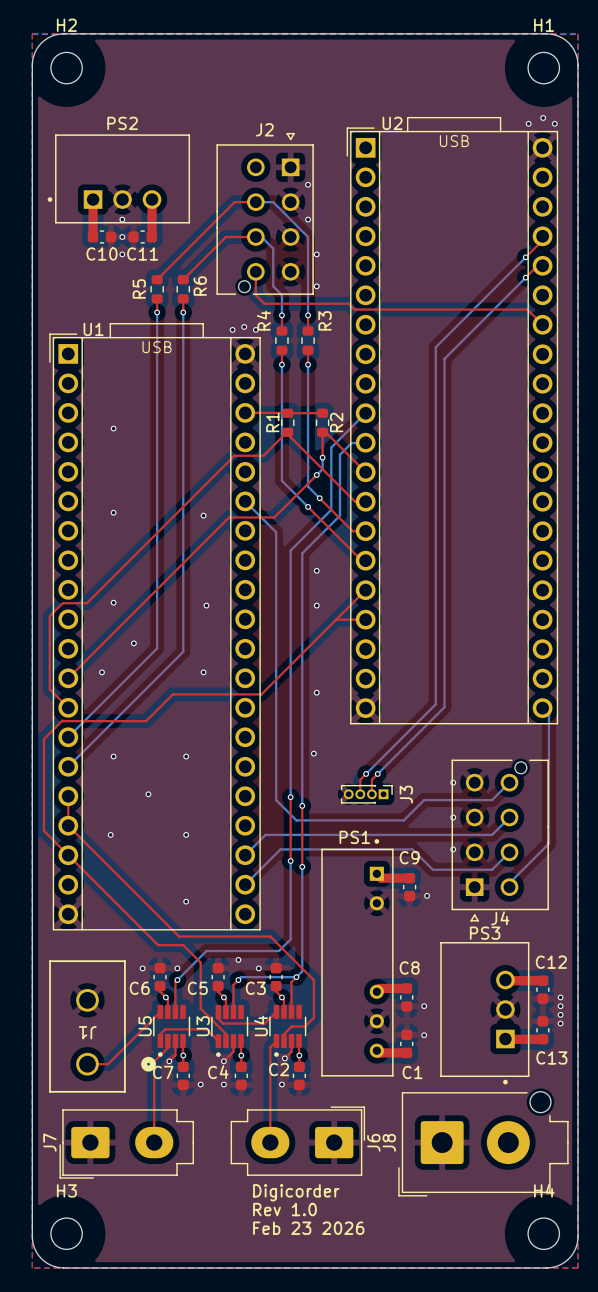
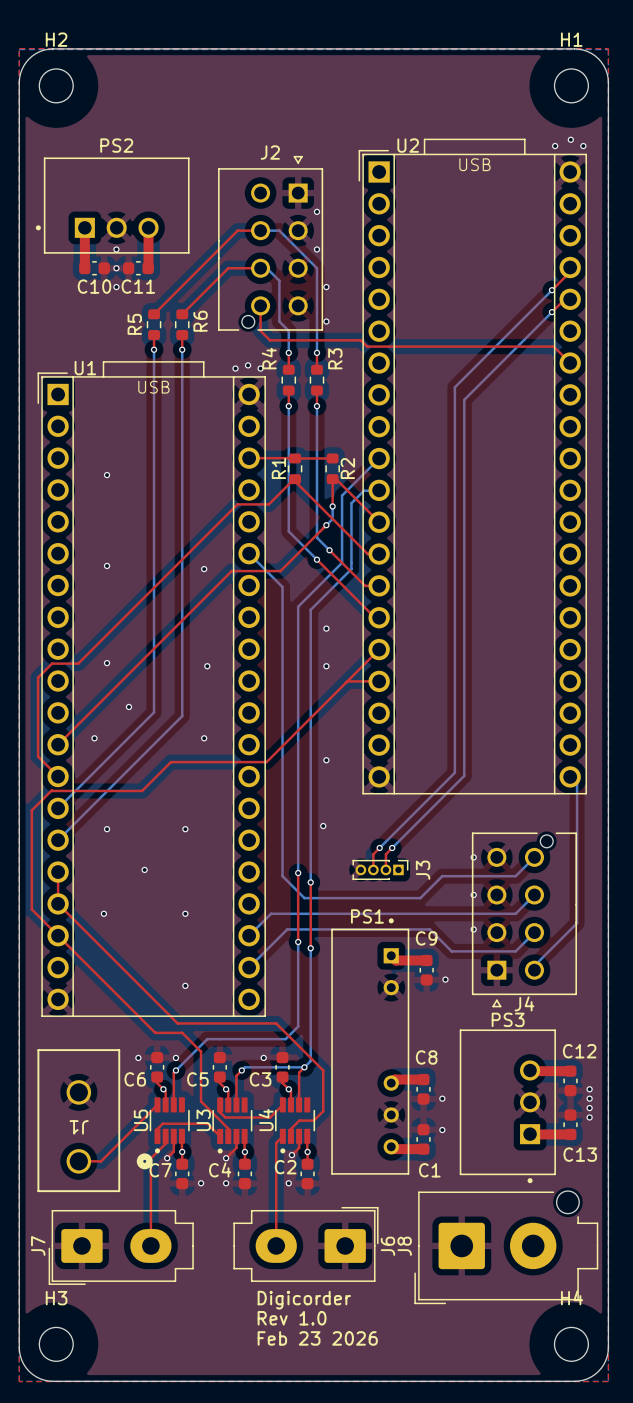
via: (238, 959) -> none

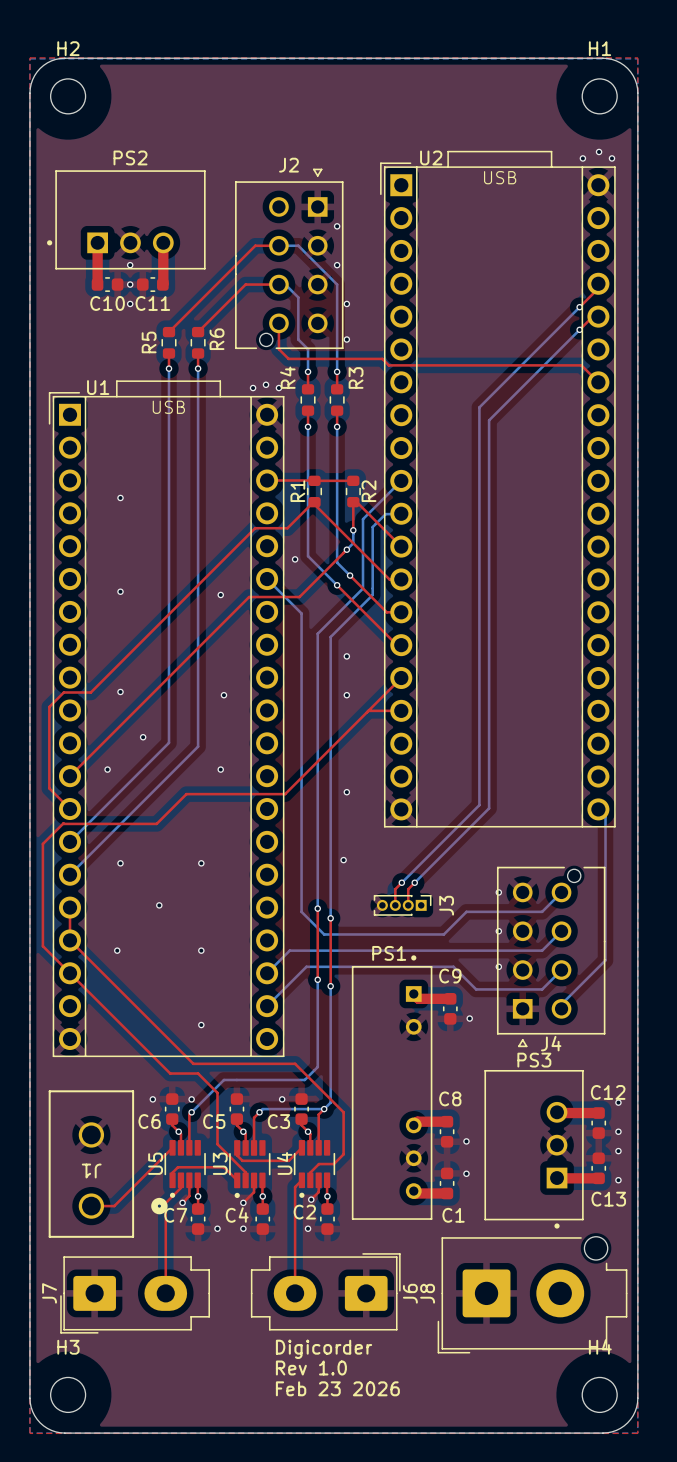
via: none -> (295, 559)
via: none -> (618, 1102)
via: (589, 1098) -> none
via: (589, 1117) -> none
via: none -> (618, 1180)

